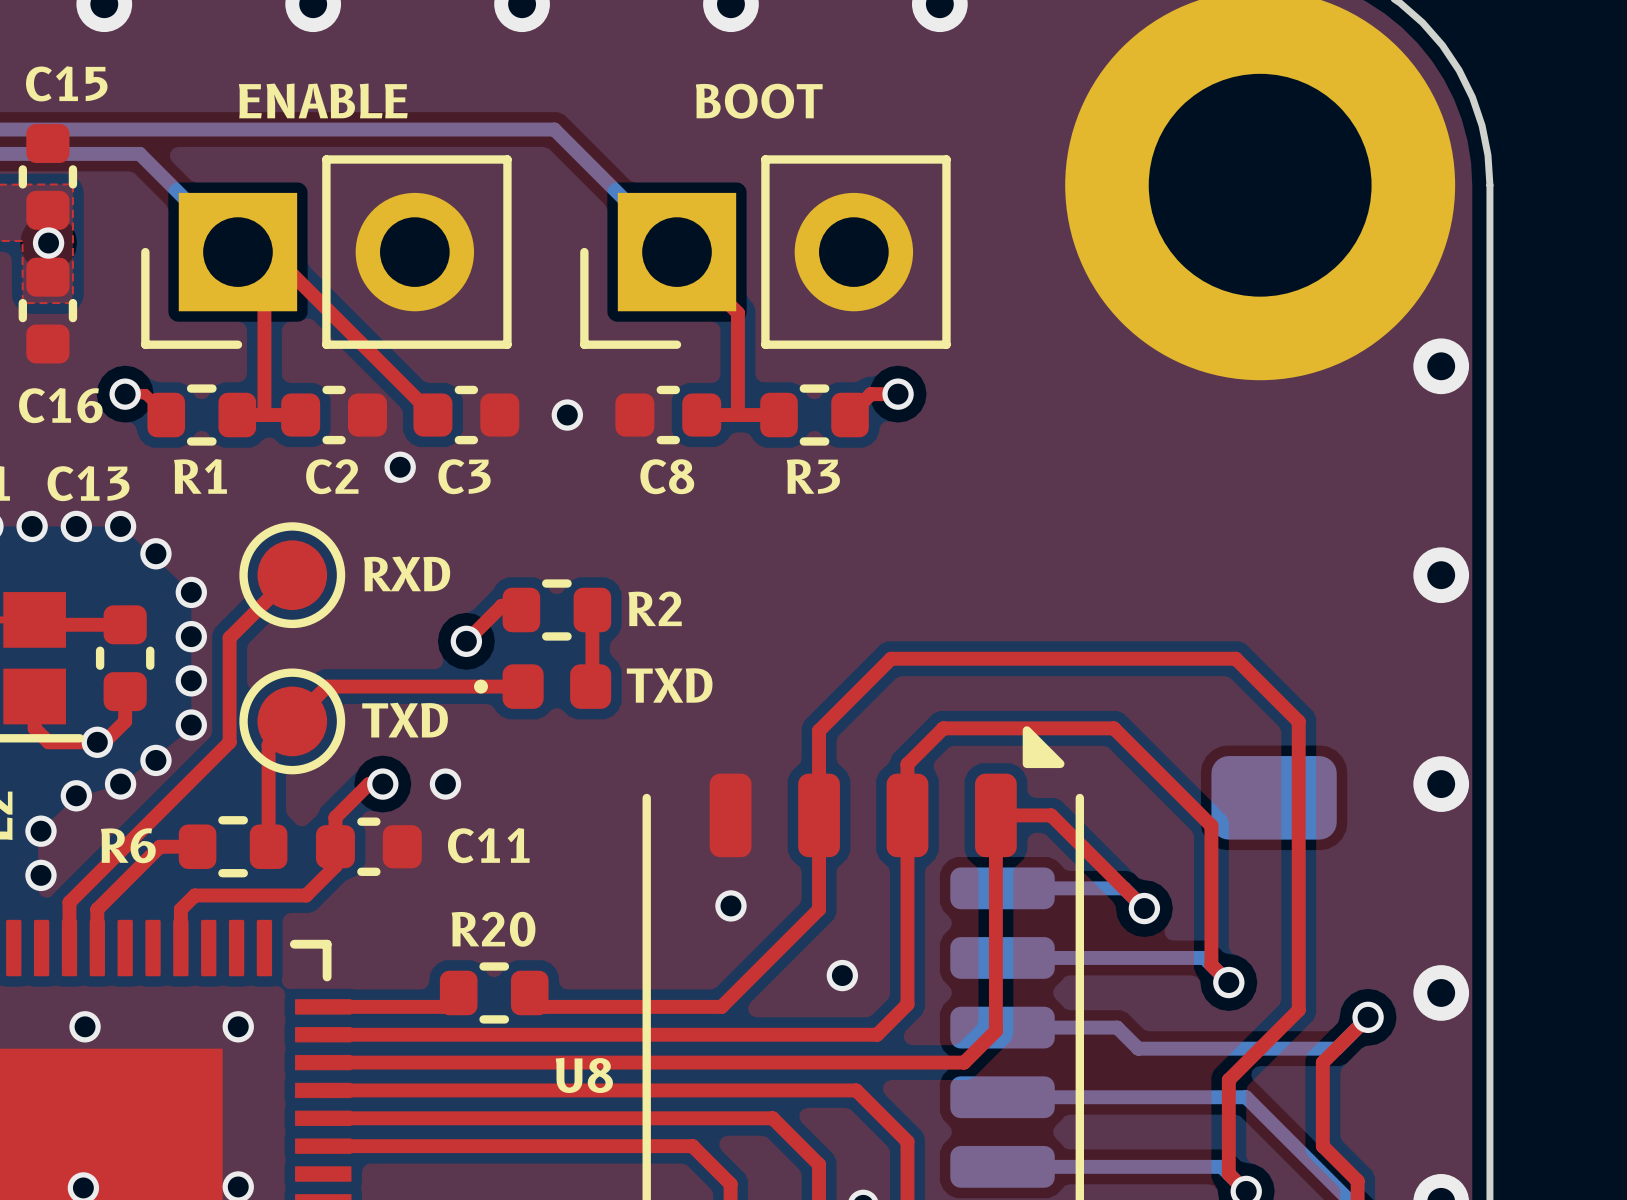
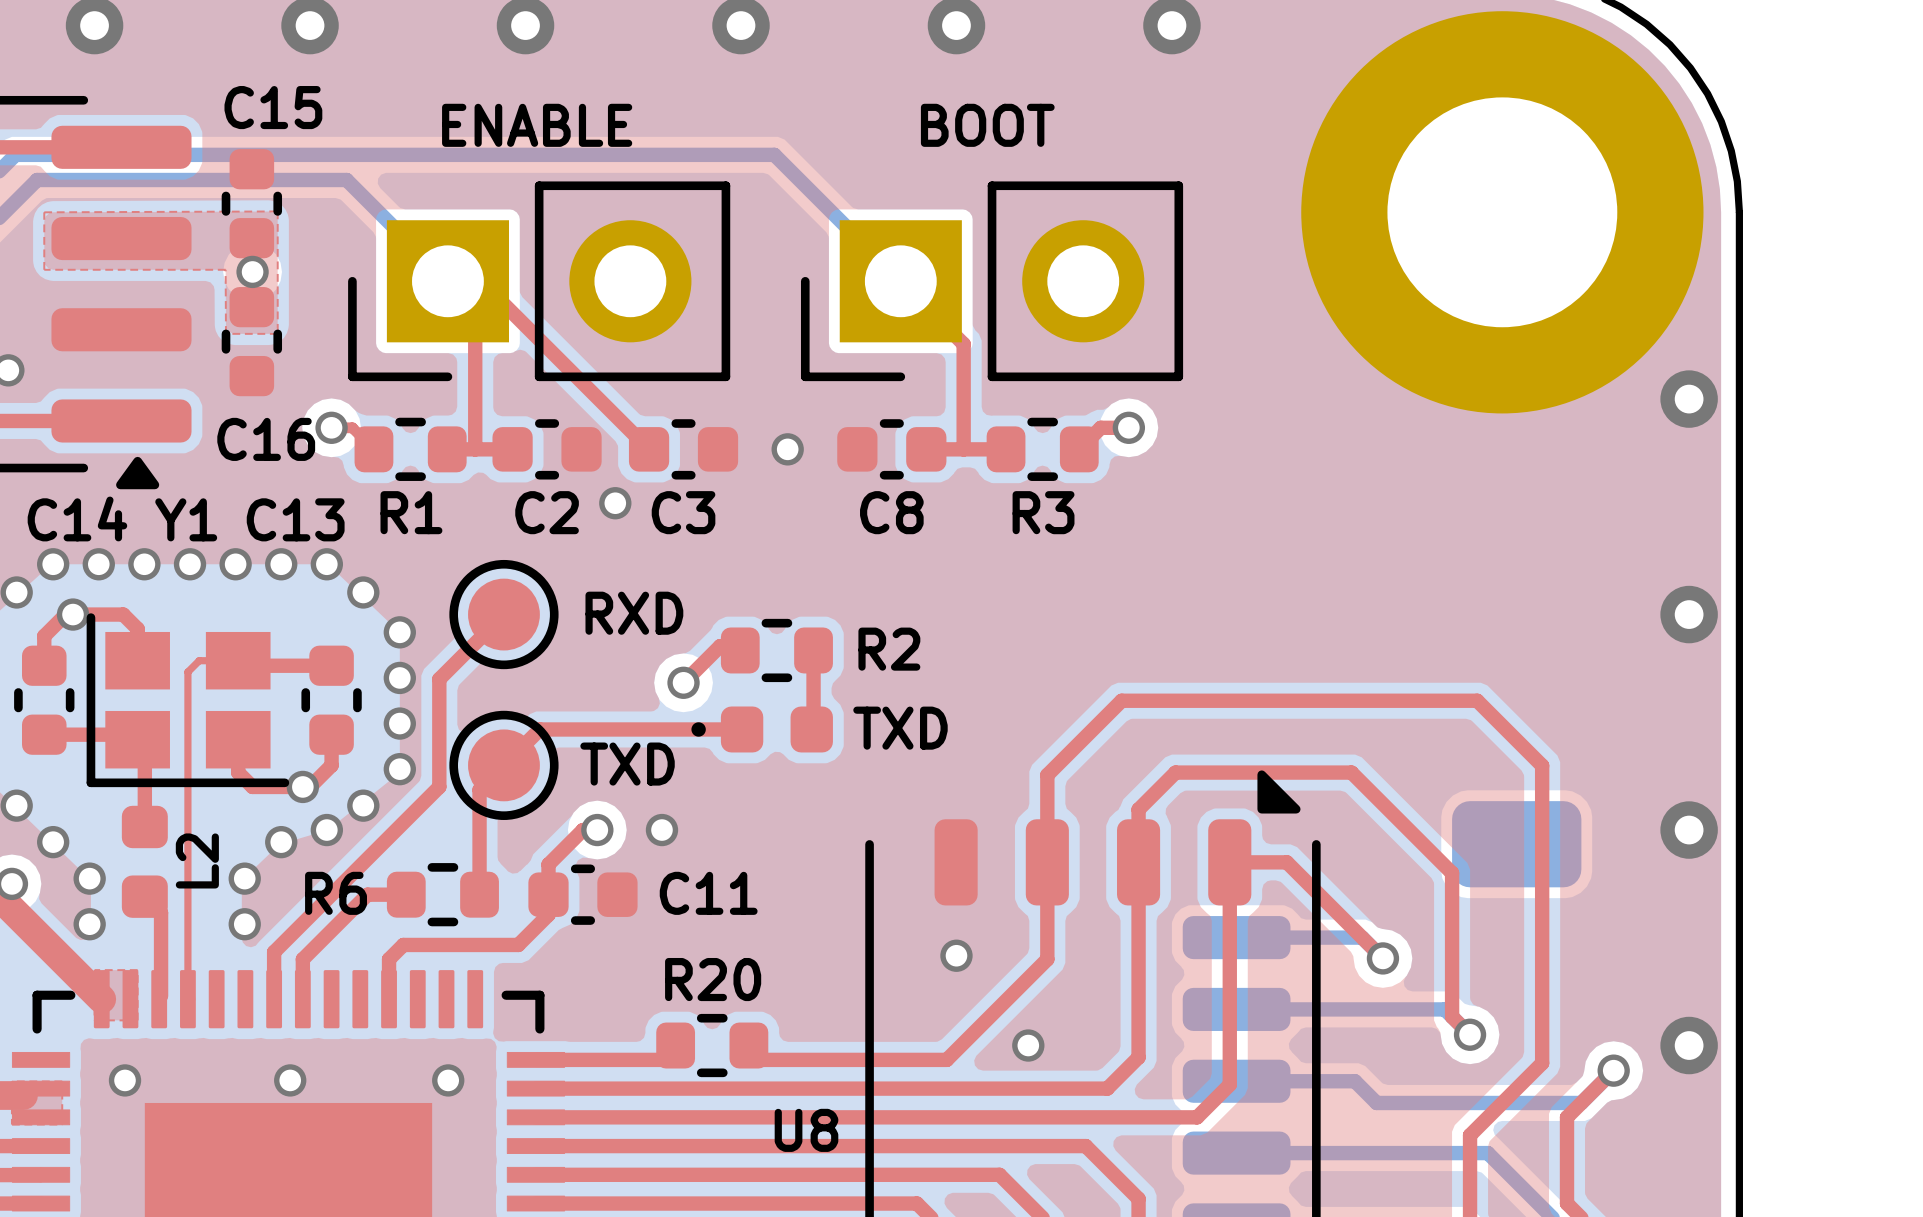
via position: (842, 975) -> (1028, 1045)

